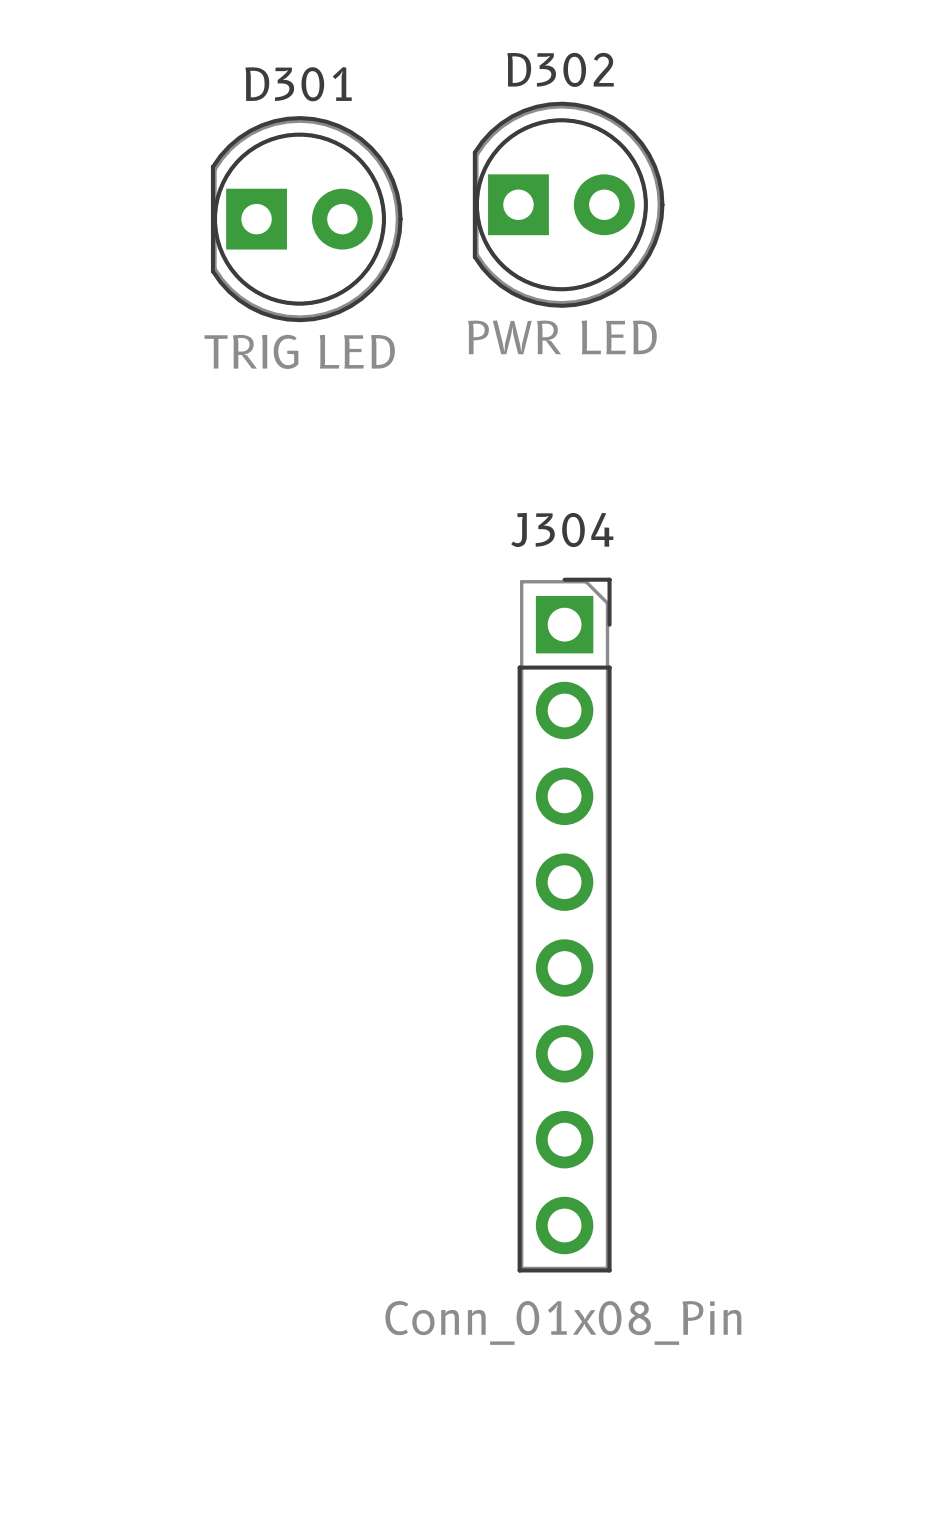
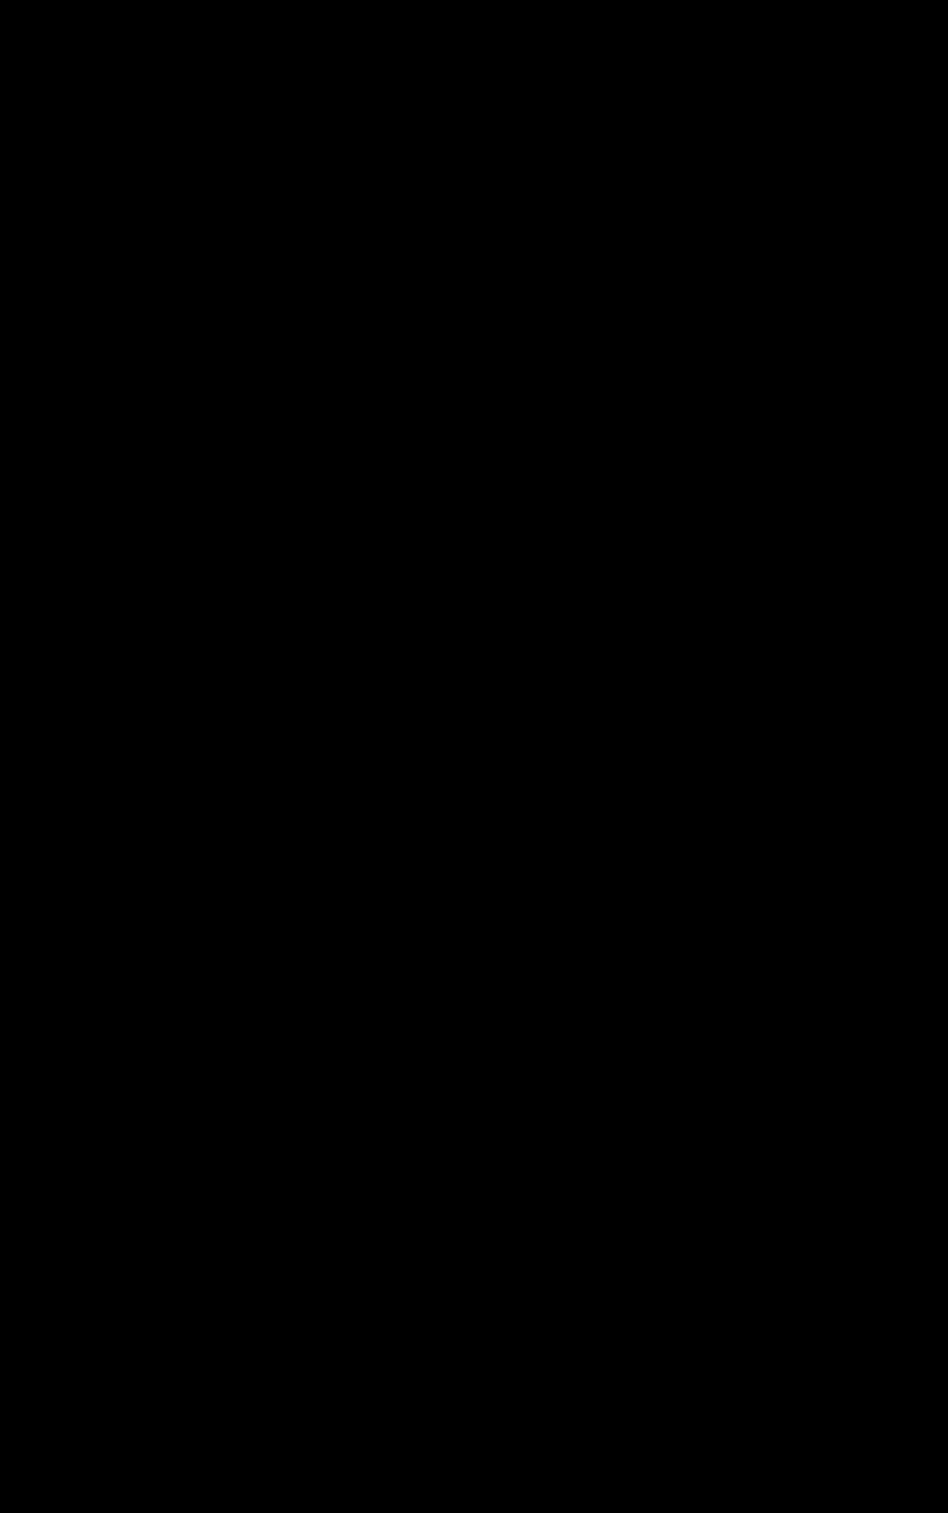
D302: PWR LED (568, 204) -> none
D301: TRIG LED (306, 219) -> none
J304: Conn_01x08_Pin (564, 925) -> none

